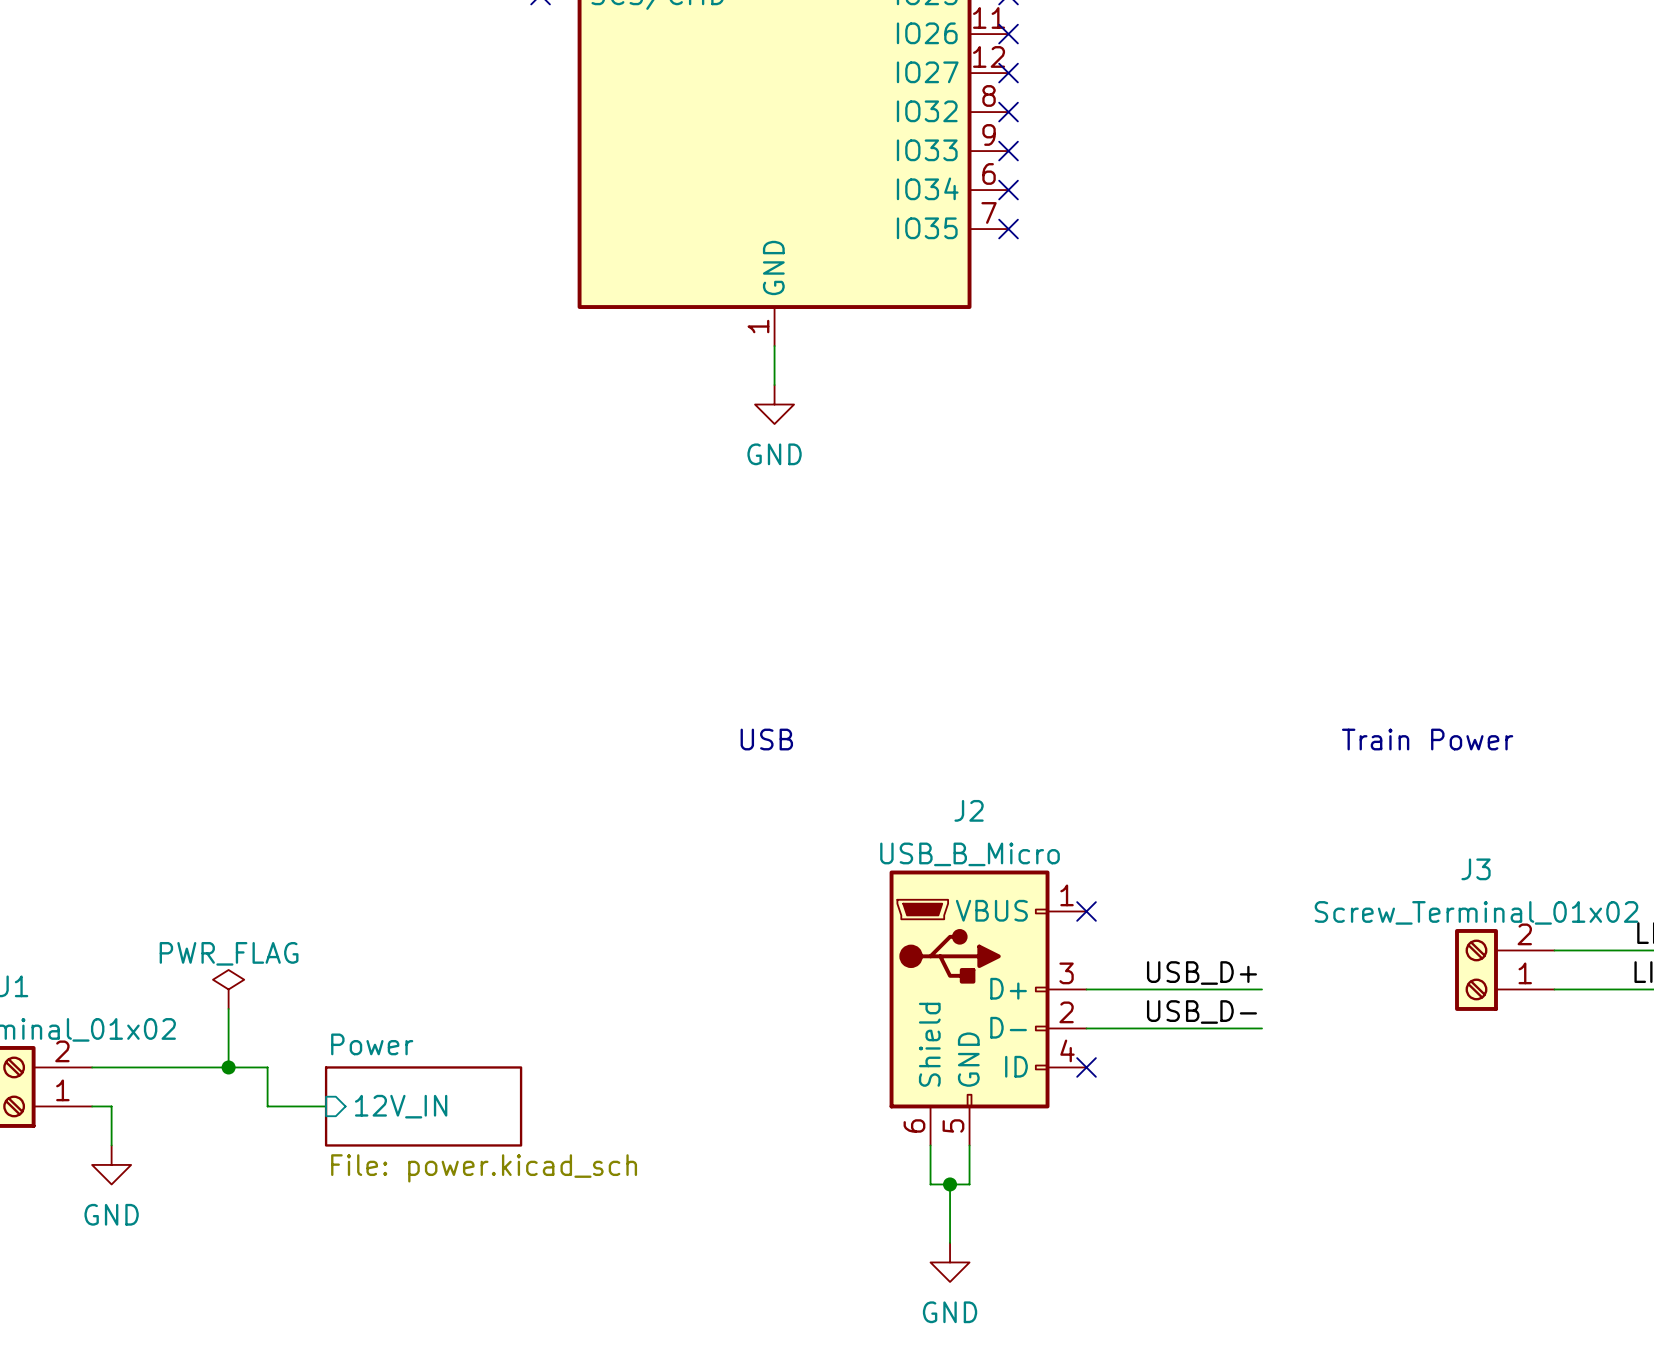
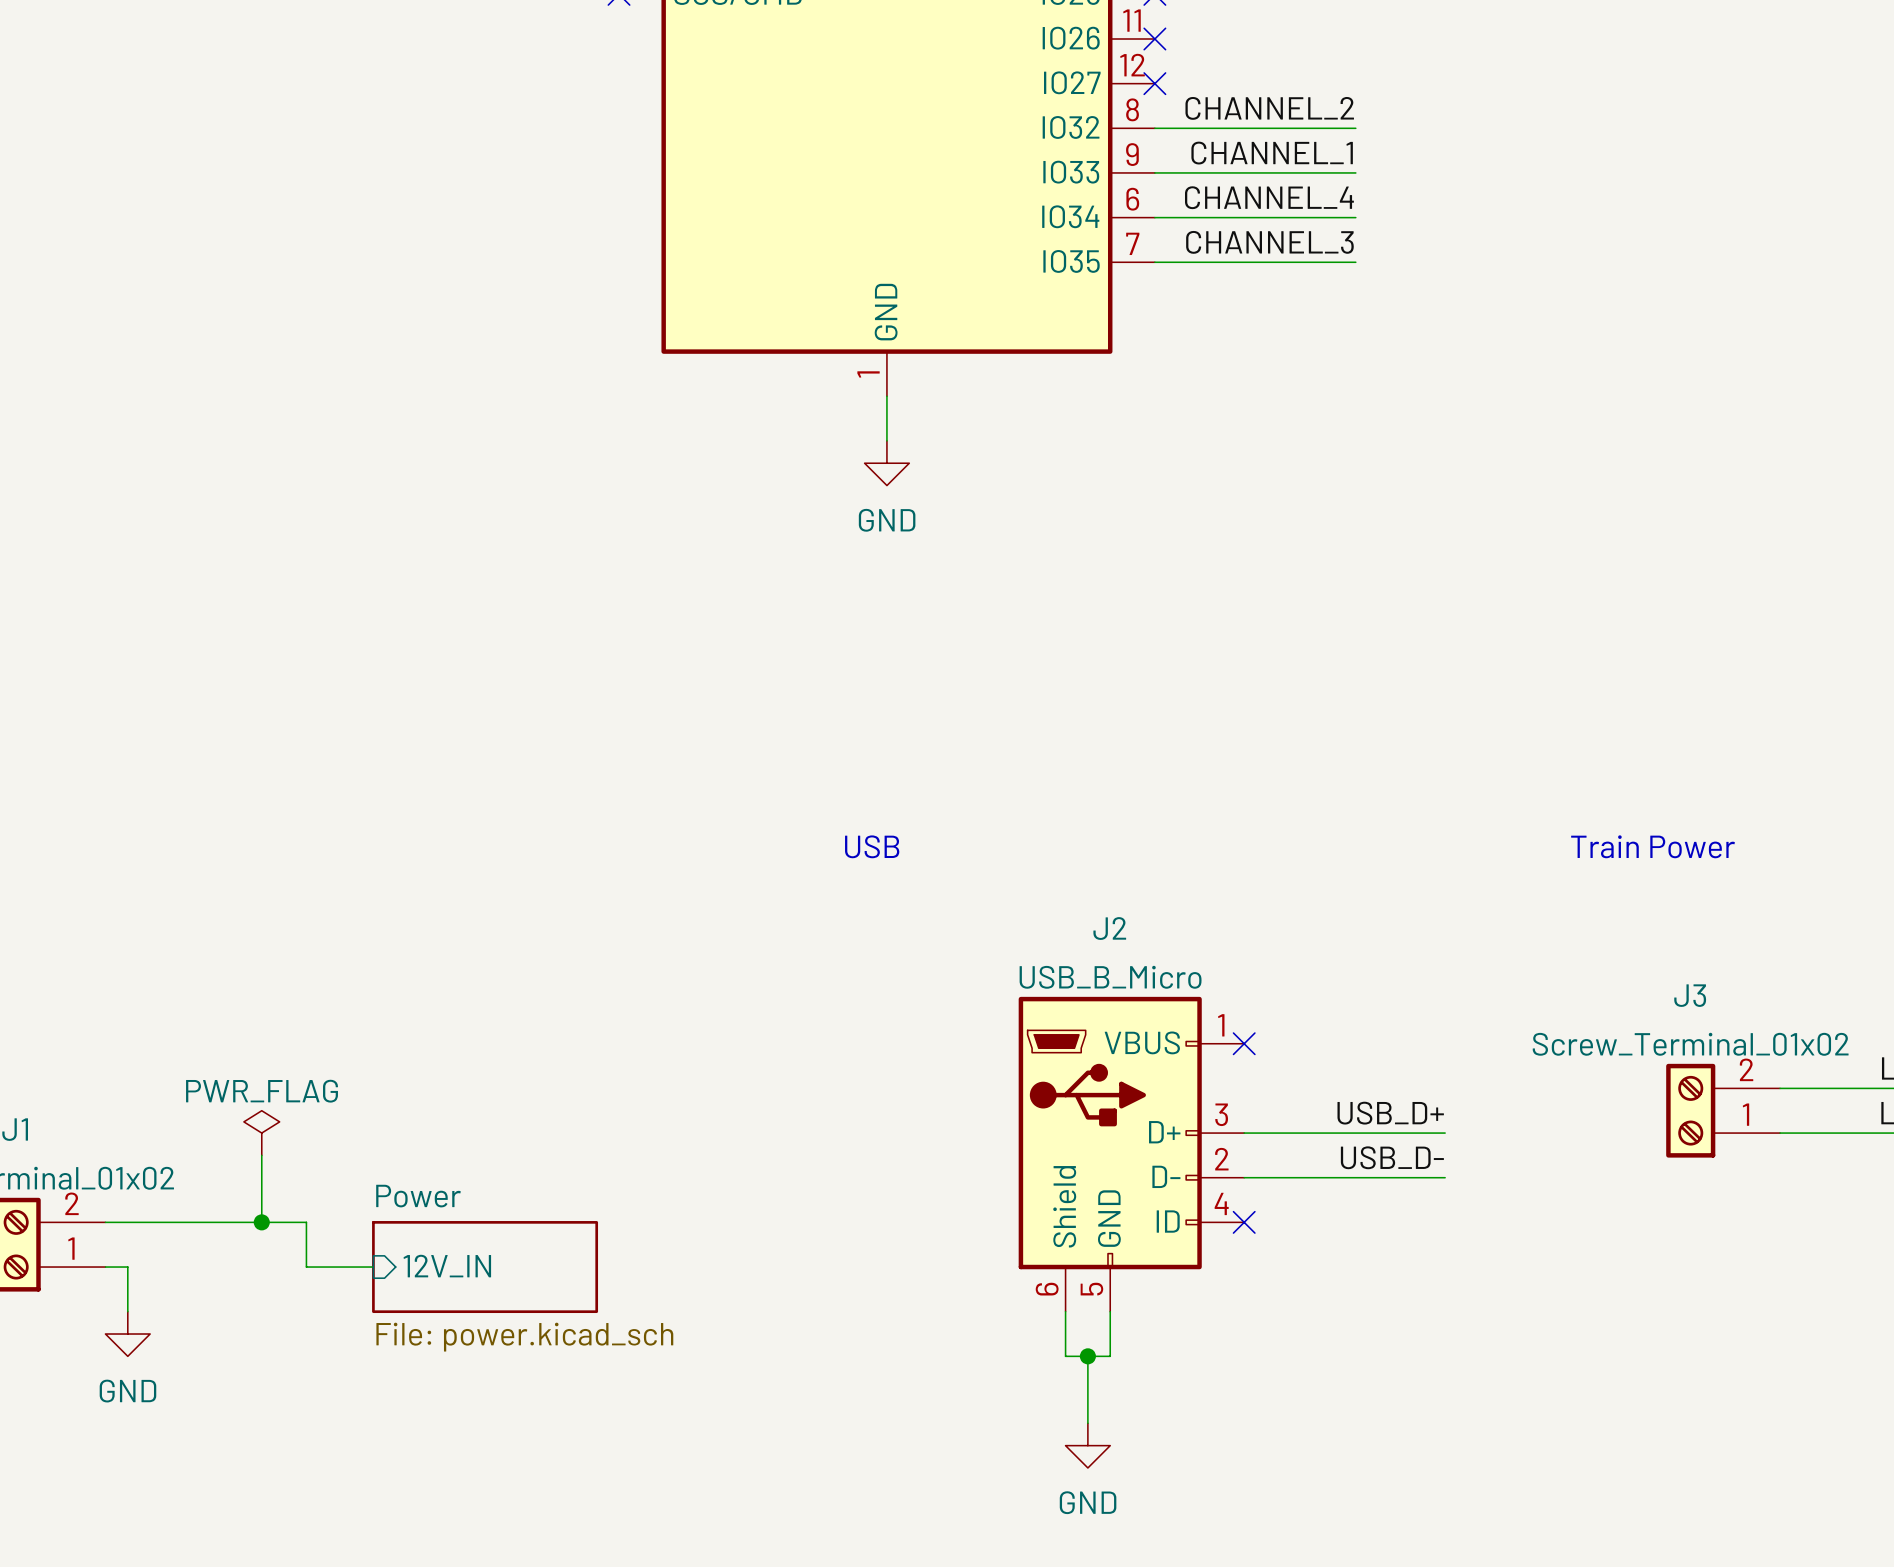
label: none -> CHANNEL_2 (1269, 108)
wire: none -> (1154, 128) (1355, 128)
no-connect mark: (1008, 112) -> none
label: none -> CHANNEL_1 (1272, 153)
wire: none -> (1154, 172) (1355, 172)
no-connect mark: (1008, 151) -> none
label: none -> CHANNEL_4 (1269, 197)
wire: none -> (1154, 217) (1355, 217)
no-connect mark: (1008, 190) -> none
label: none -> CHANNEL_3 (1269, 242)
wire: none -> (1154, 262) (1355, 262)
no-connect mark: (1008, 229) -> none

